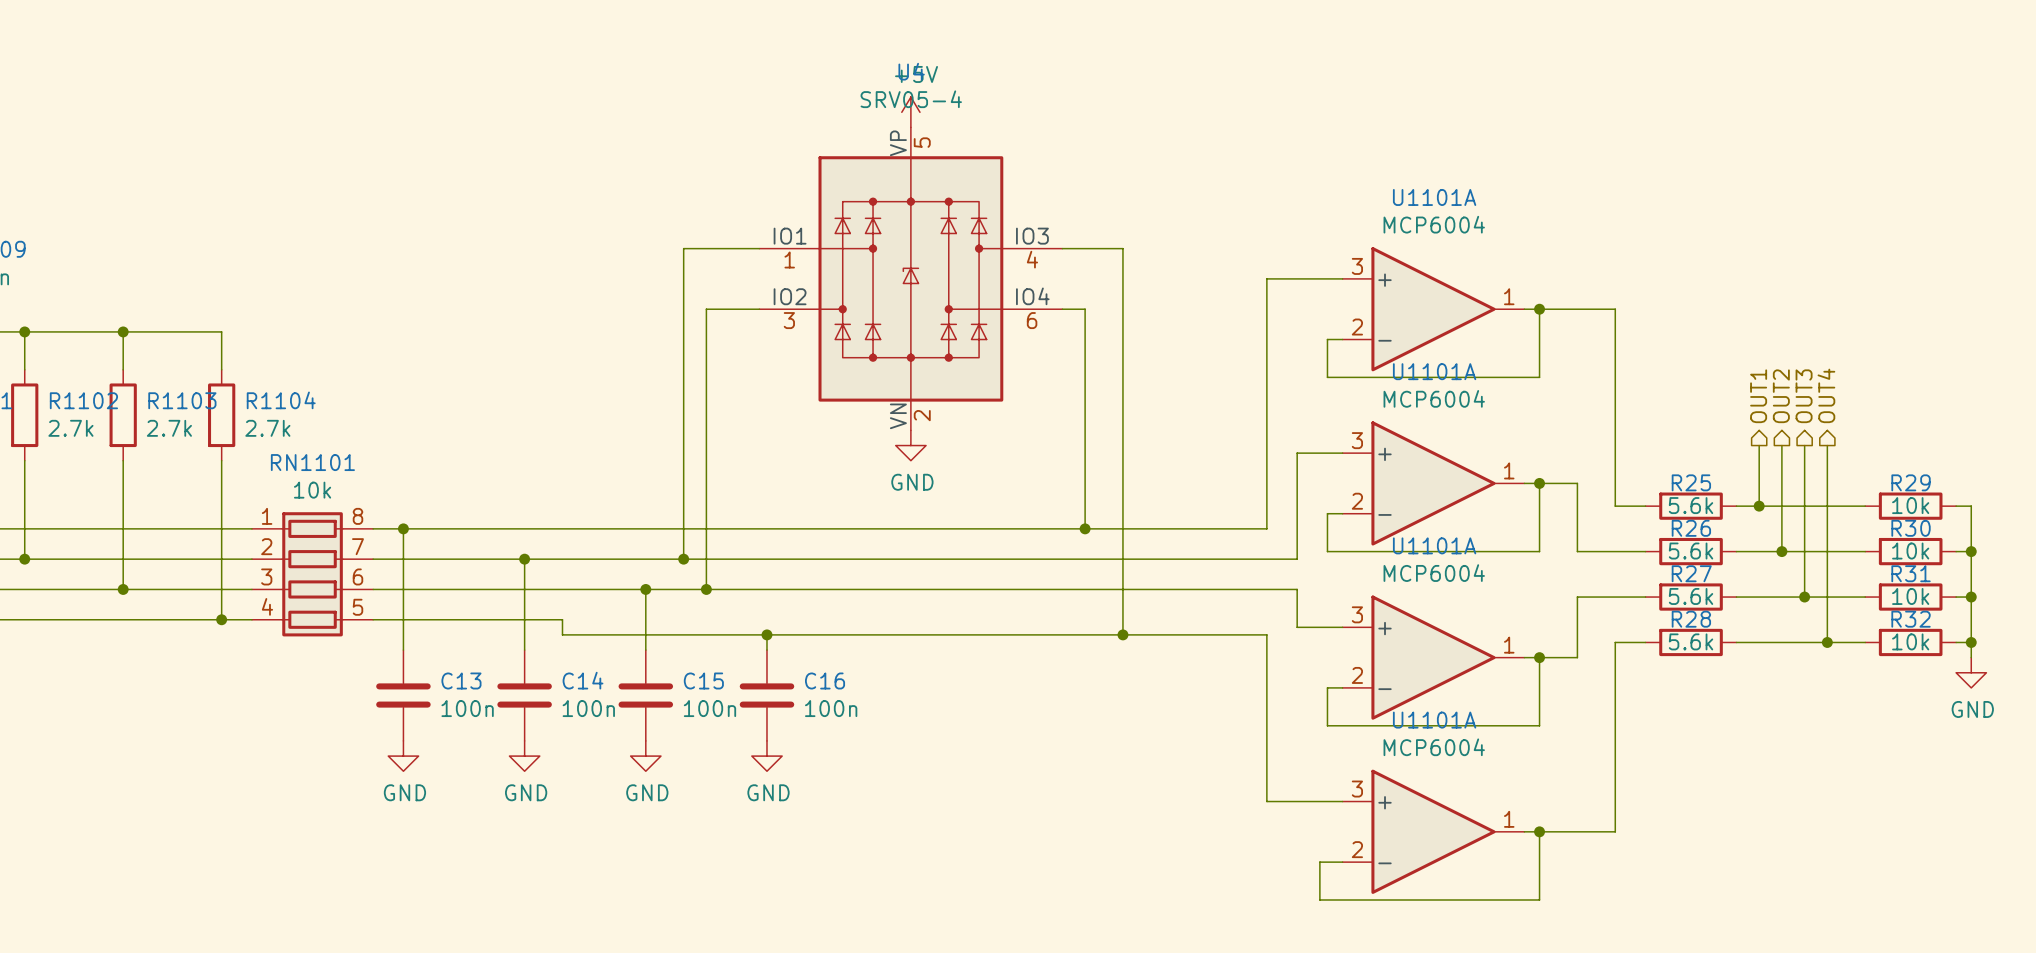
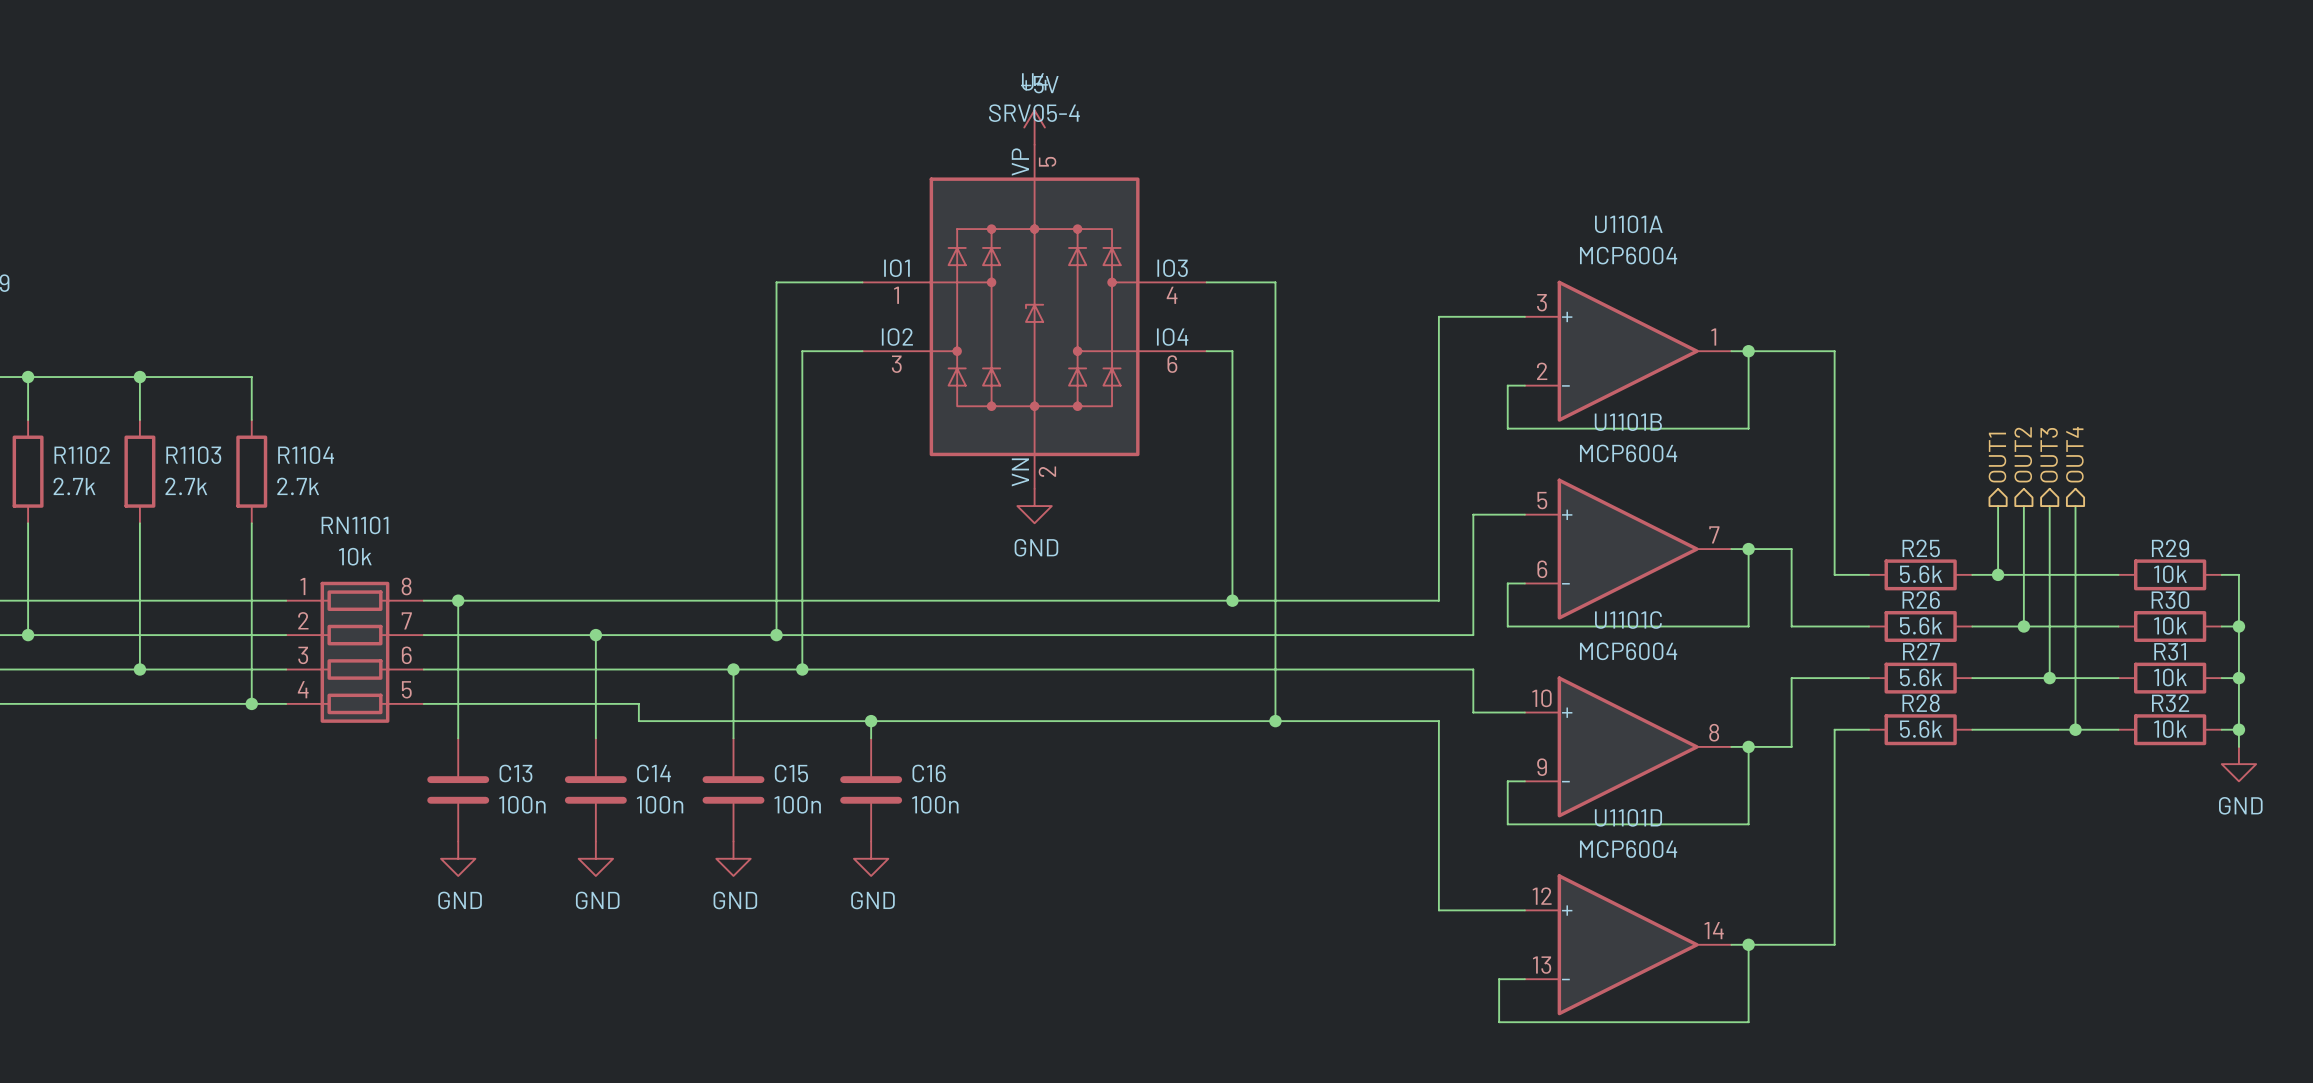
U1101A name: U1101A (1434, 371) -> U1101B (1628, 422)
U1101A pin number: 3 (1357, 440) -> 5 (1542, 500)
U1101A pin number: 1 (1509, 470) -> 7 (1714, 534)
U1101A pin number: 2 (1357, 501) -> 6 (1542, 569)
U1101A name: U1101A (1434, 545) -> U1101C (1628, 620)
U1101A pin number: 3 (1357, 614) -> 10 (1541, 698)
U1101A pin number: 1 (1509, 645) -> 8 (1714, 732)
U1101A pin number: 2 (1357, 675) -> 9 (1542, 767)
U1101A name: U1101A (1434, 720) -> U1101D (1628, 817)
U1101A pin number: 3 (1357, 789) -> 12 (1542, 896)
U1101A pin number: 1 (1509, 819) -> 14 (1714, 930)
U1101A pin number: 2 (1357, 849) -> 13 (1542, 965)

